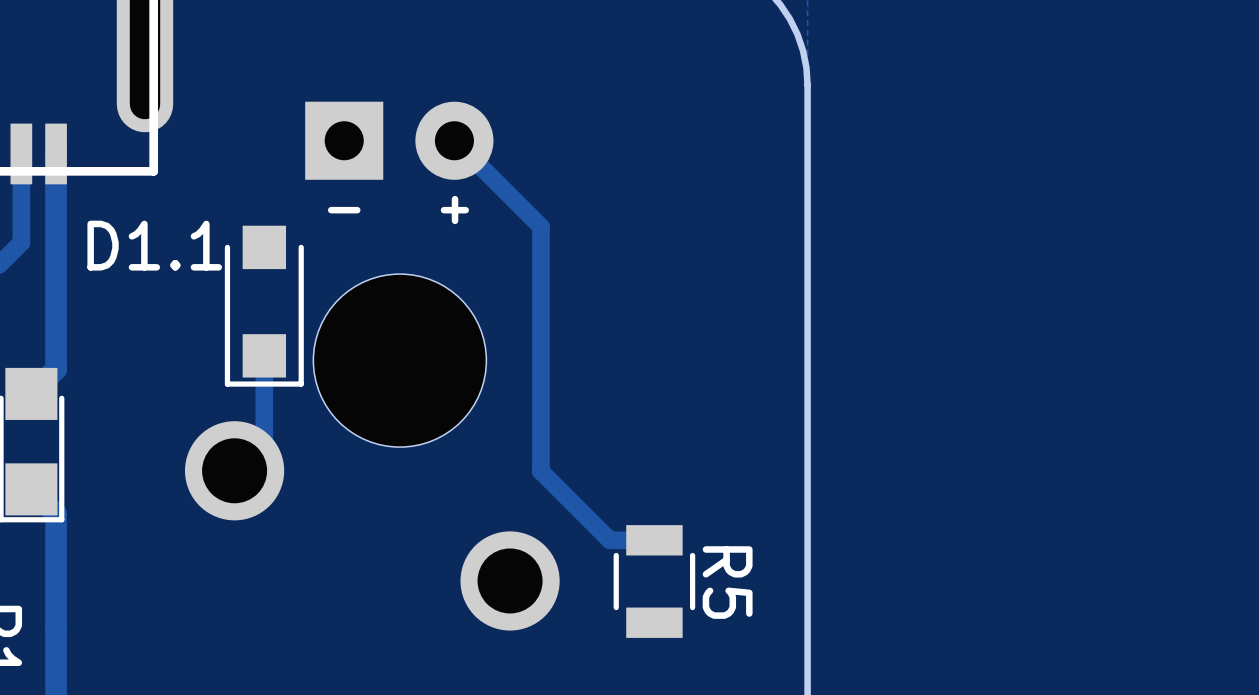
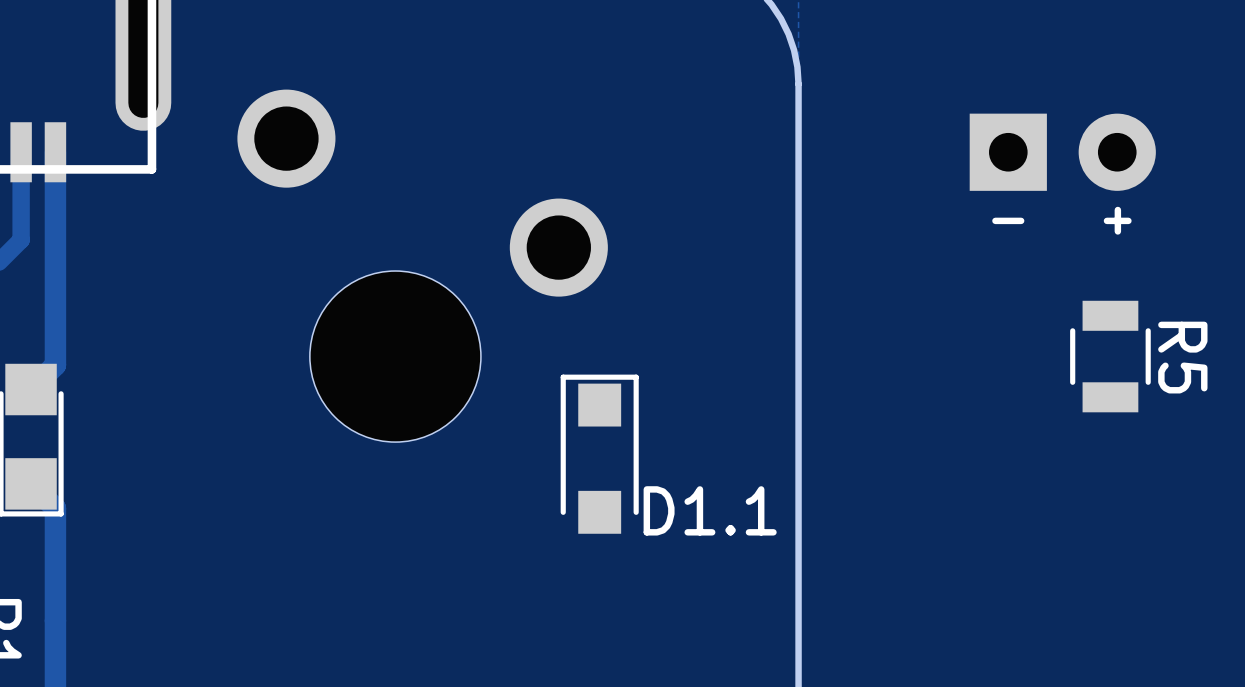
track: (454, 140) (540, 226) (540, 471) (609, 540) (654, 540) -> none
part position: (399, 162) -> (1062, 174)
D1.1 rotation: 0° (264, 306) -> 180° (599, 454)
D1.1 position: (264, 306) -> (599, 454)
track: (264, 355) (264, 441) -> none
part rotation: 0° (372, 452) -> 180° (422, 265)
R5 position: (654, 581) -> (1110, 356)

